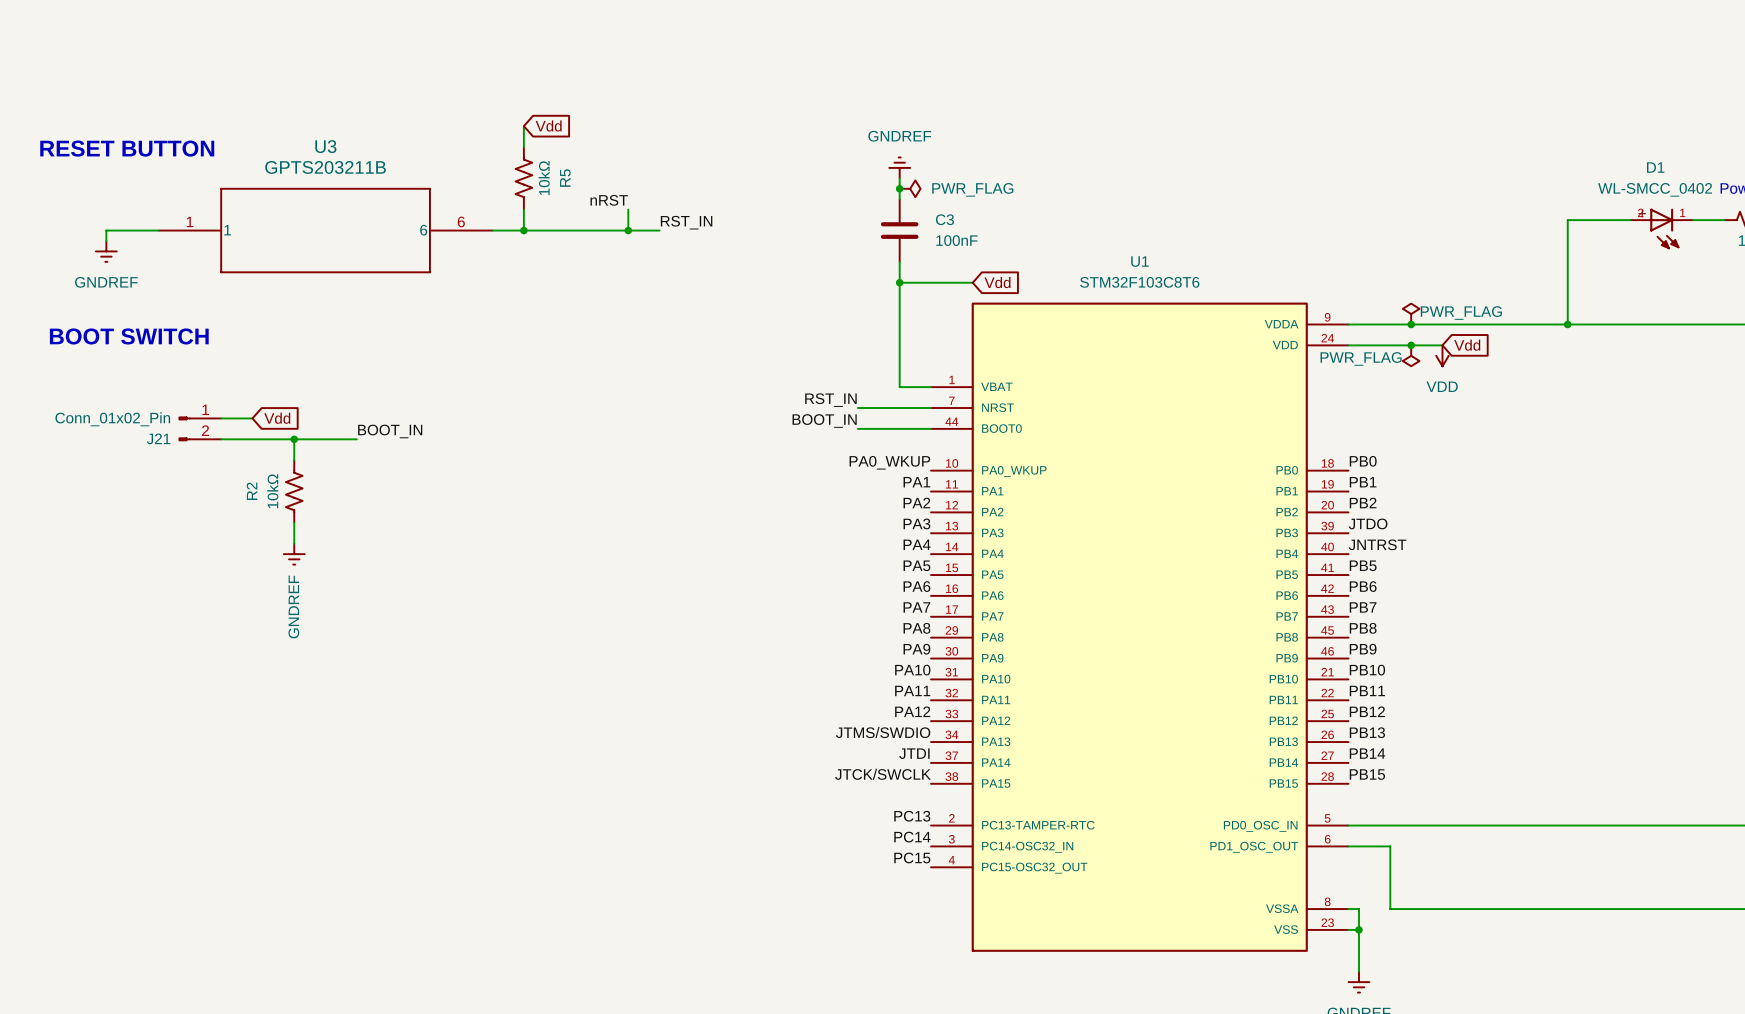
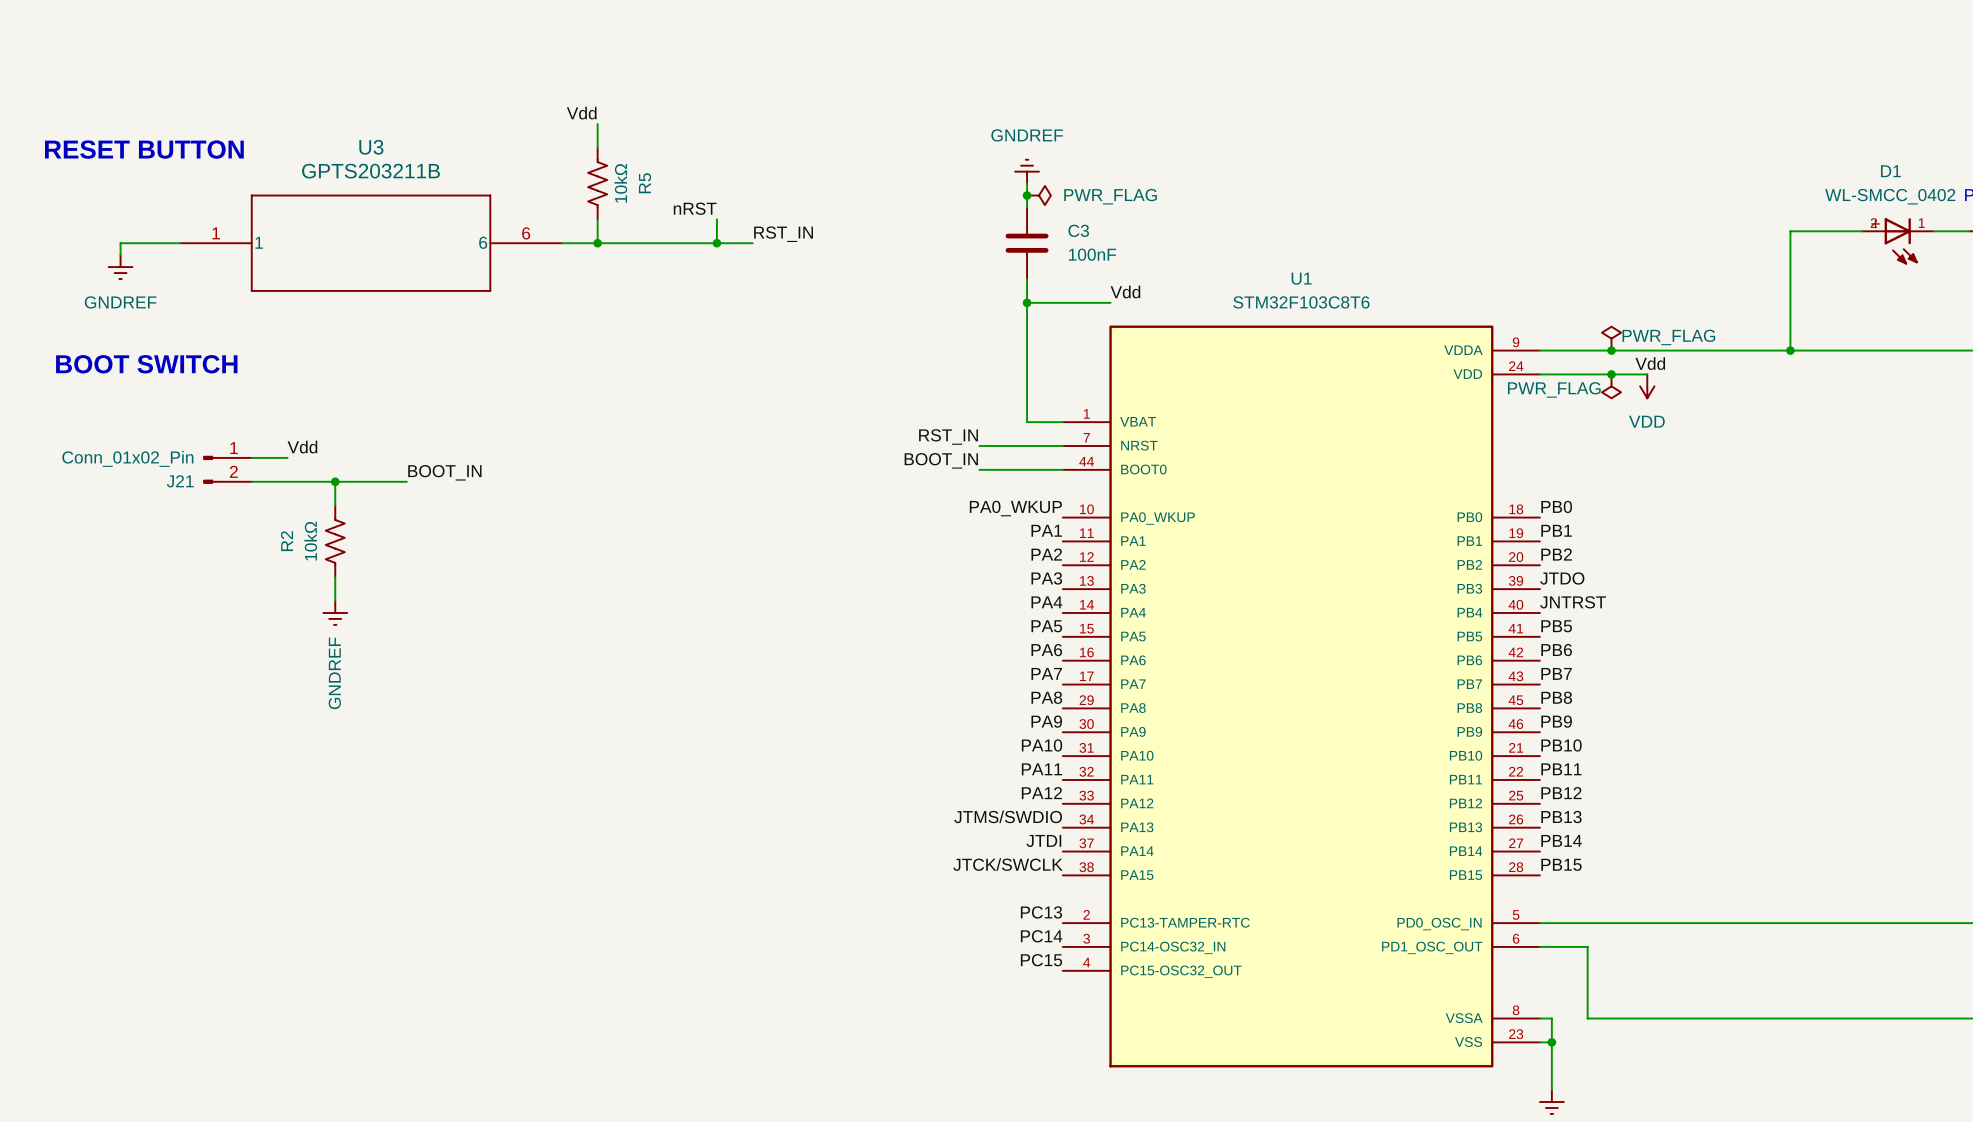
label: none -> Vdd (581, 113)
global label: Vdd (548, 125) -> none
label: none -> Vdd (1125, 291)
global label: Vdd (997, 282) -> none
label: none -> Vdd (1650, 363)
global label: Vdd (1467, 345) -> none
label: none -> Vdd (302, 447)
global label: Vdd (277, 418) -> none

